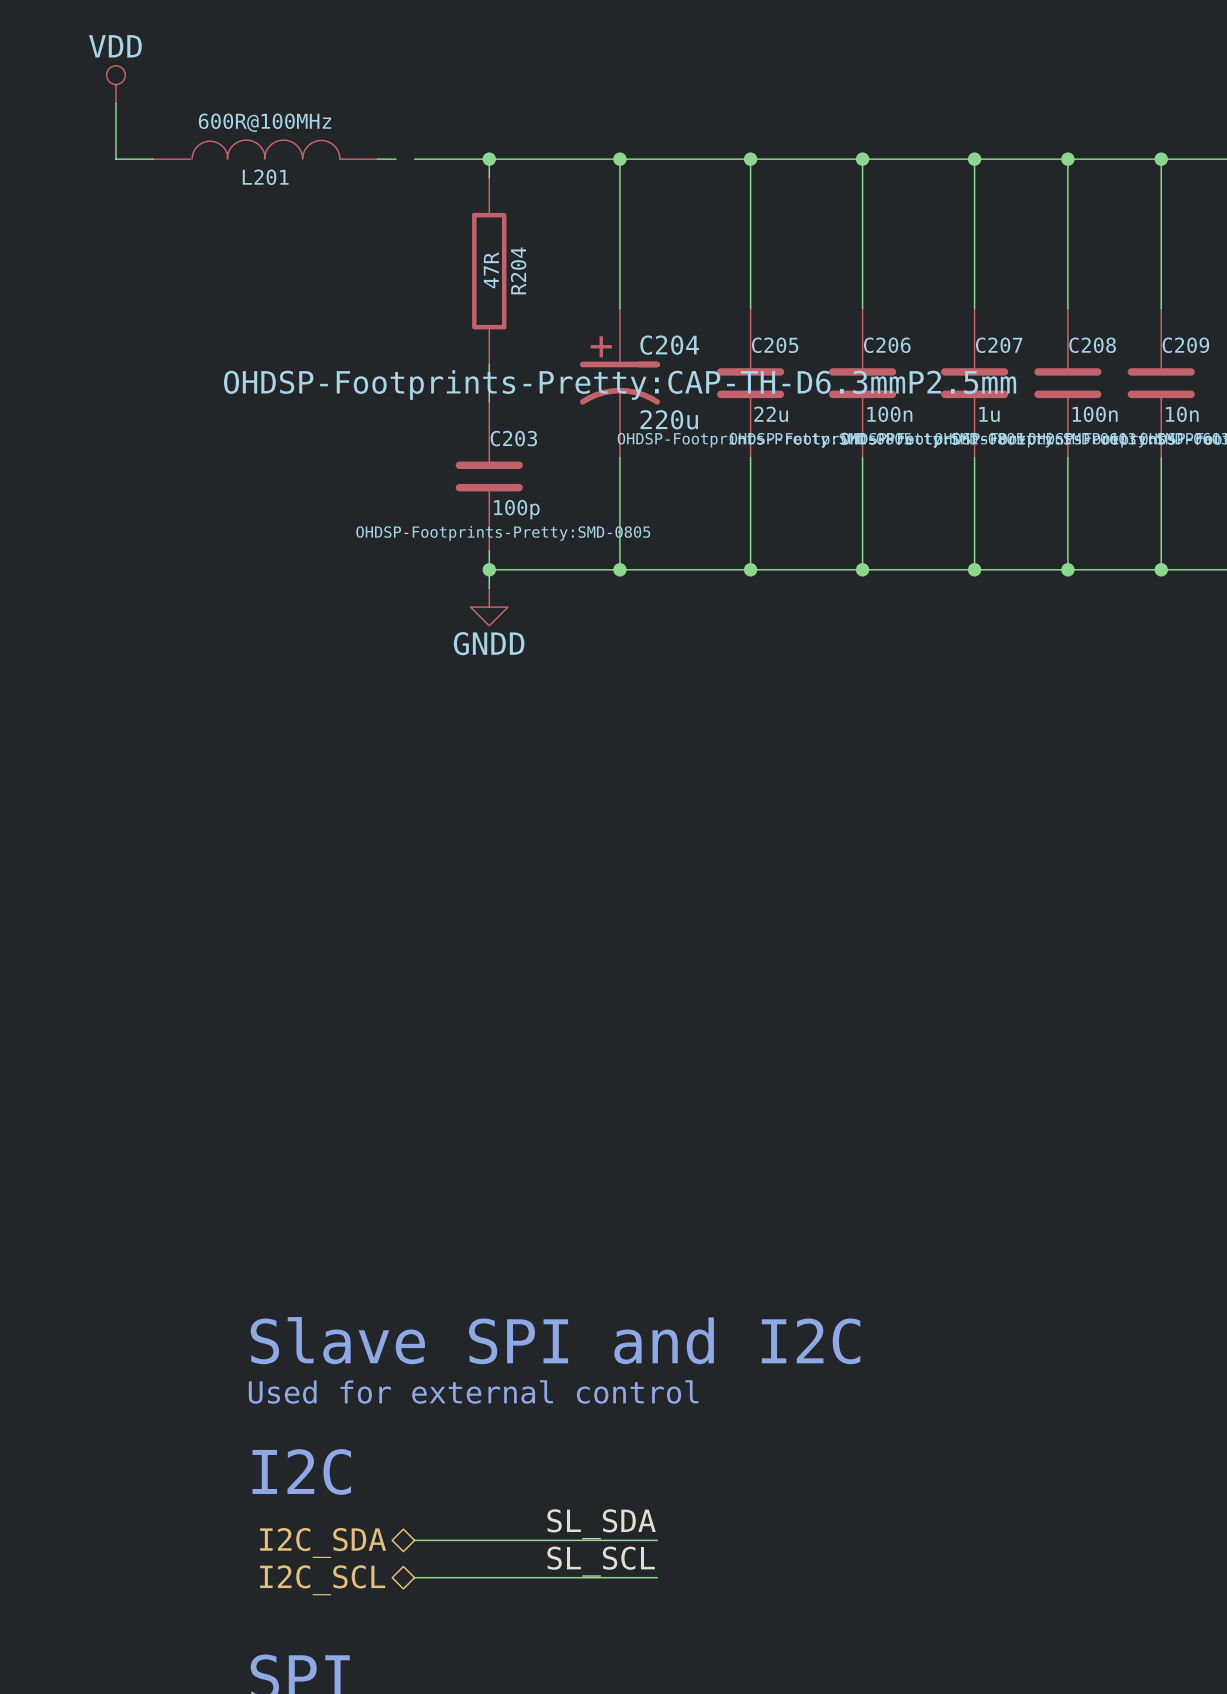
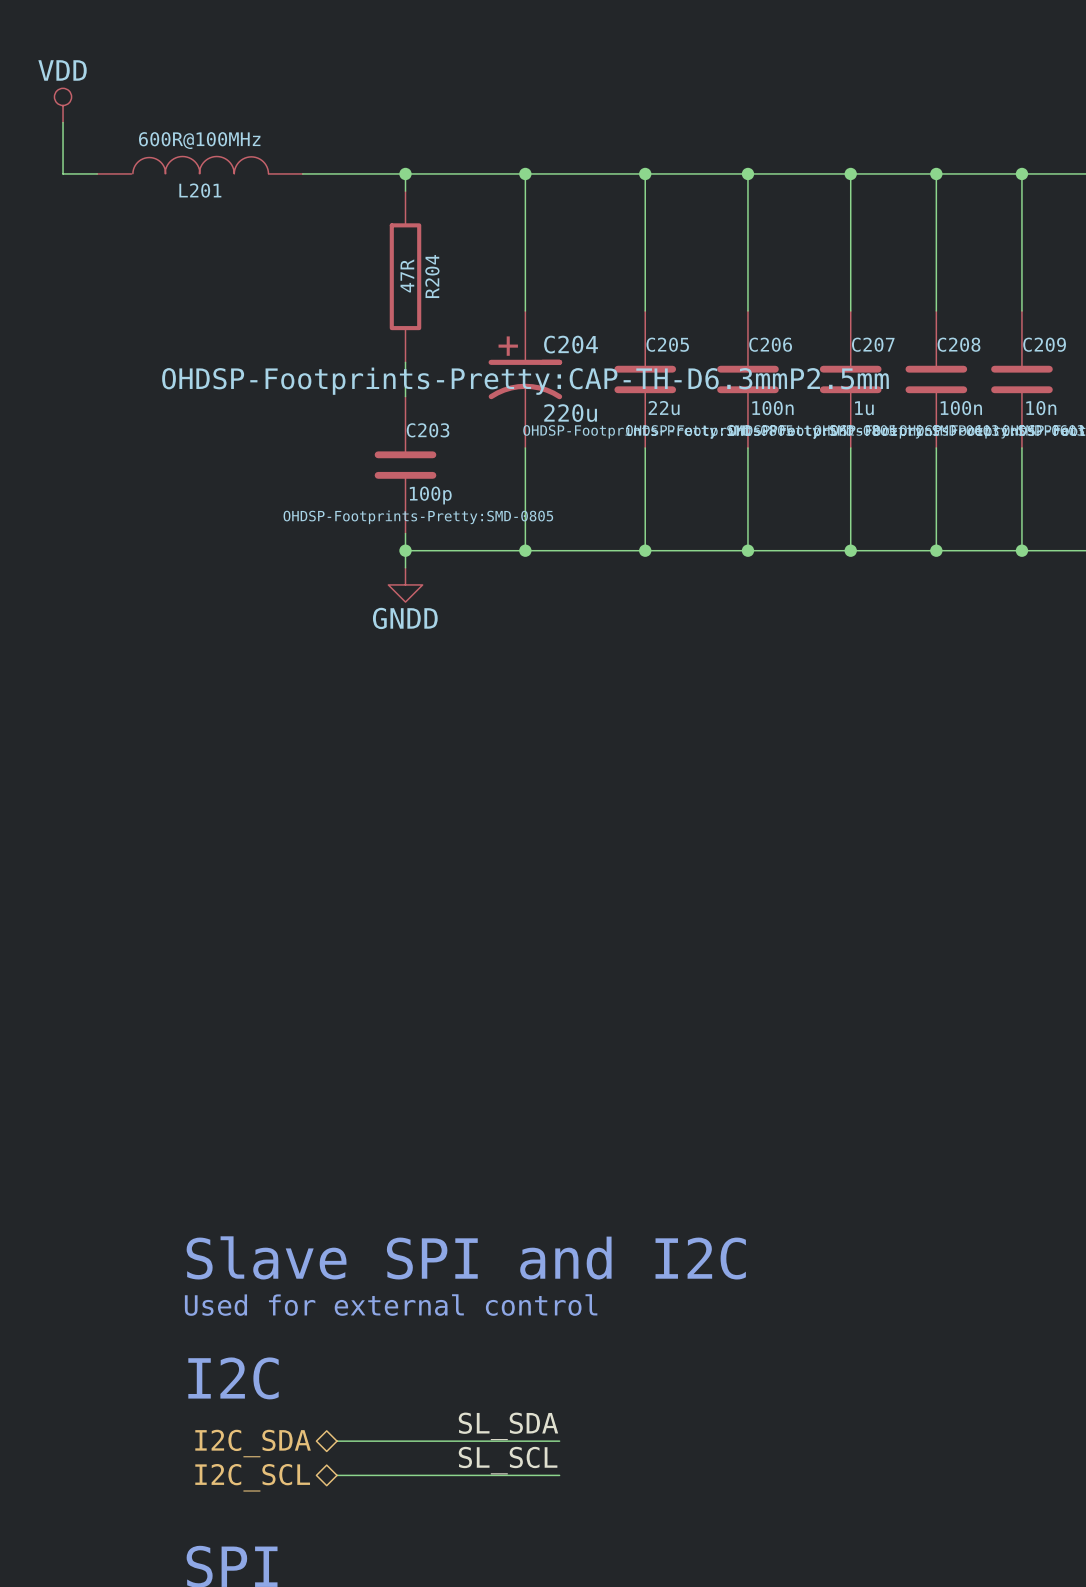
wire: none -> (319, 173) (337, 173)

